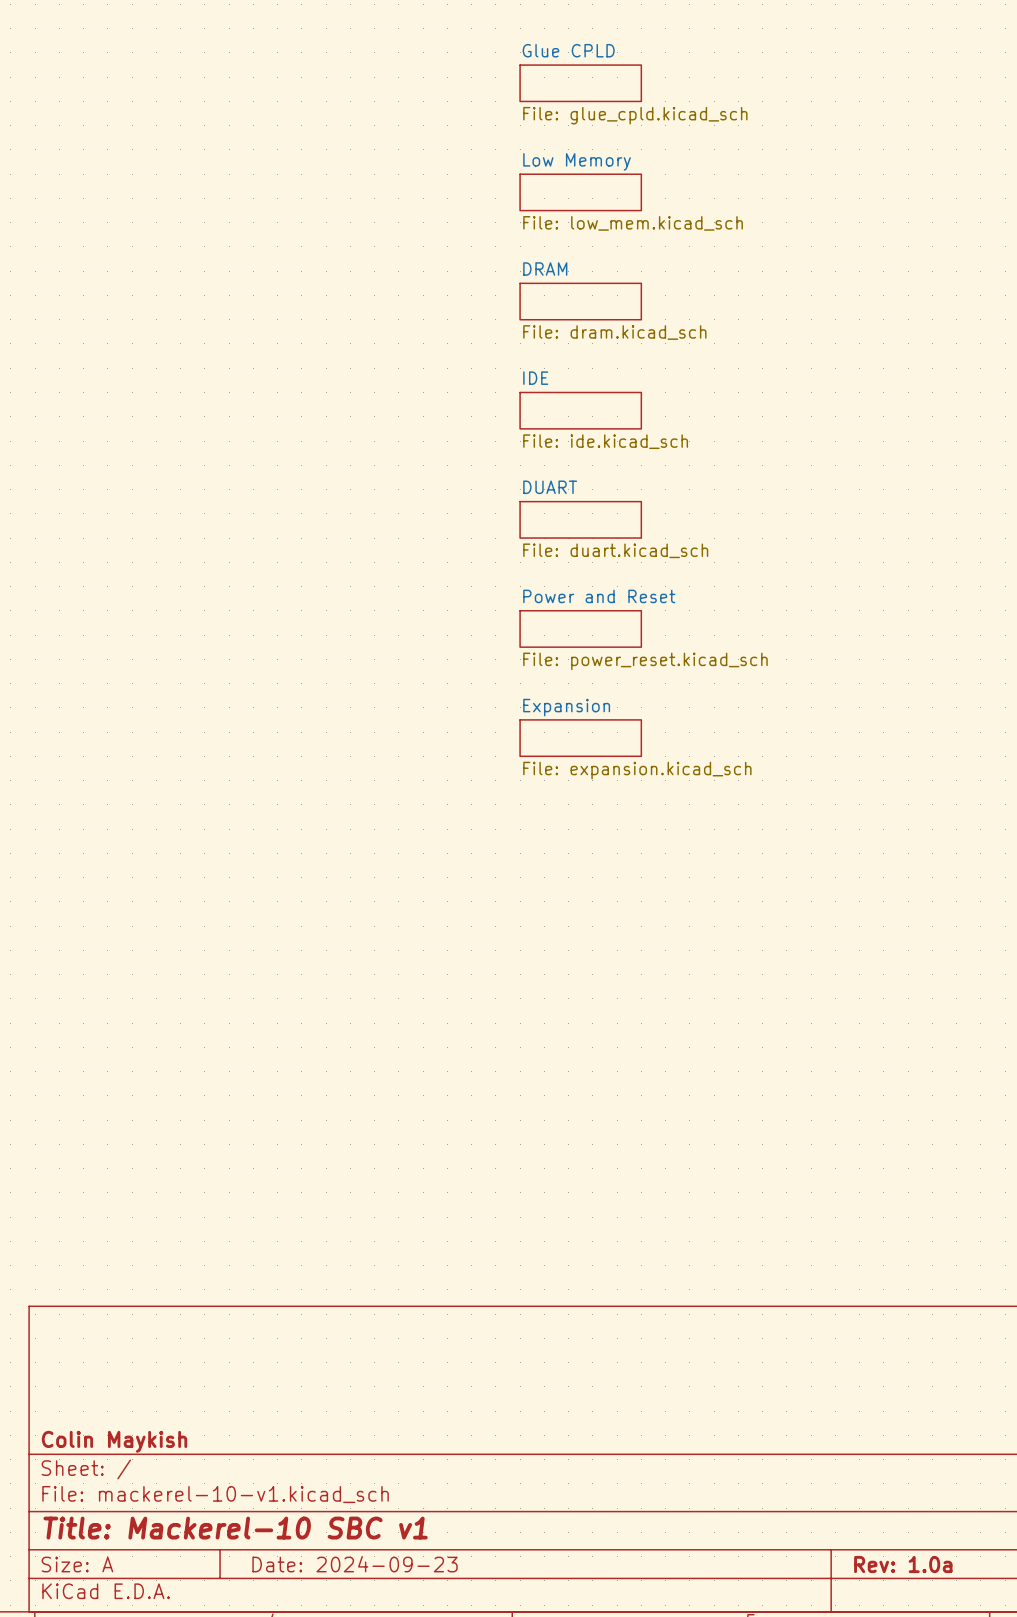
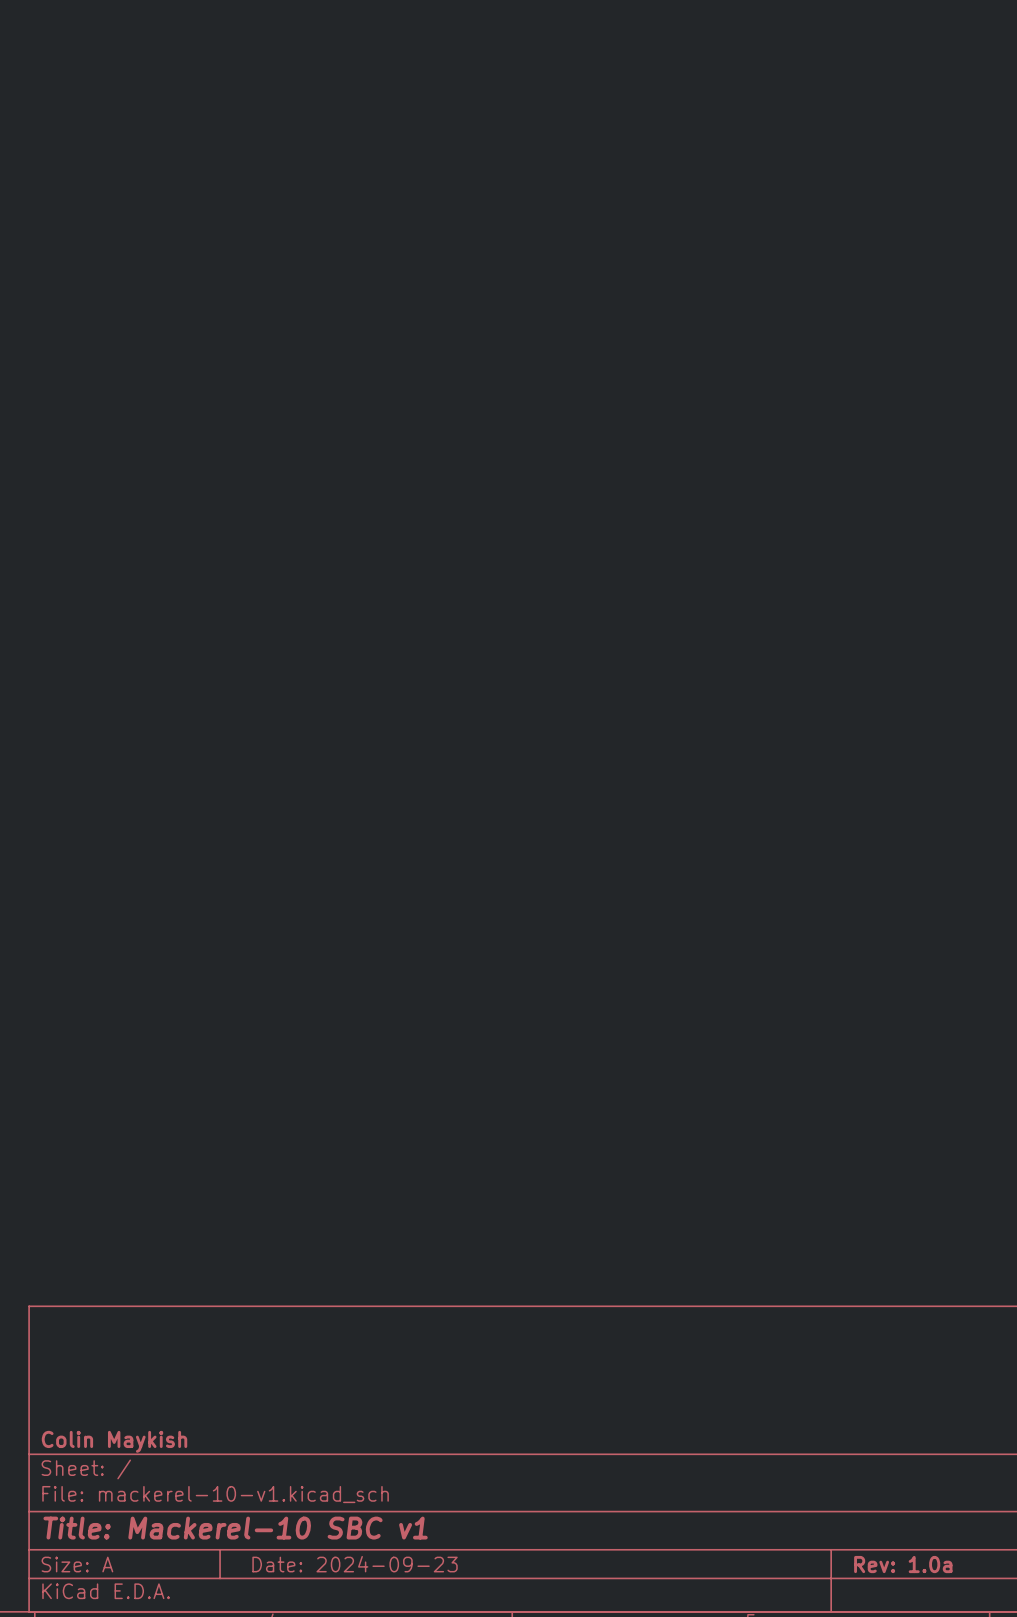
sheet Glue CPLD: File: glue_cpld.kicad_sch (580, 83) -> none
sheet Low Memory: File: low_mem.kicad_sch (580, 192) -> none
sheet DRAM: File: dram.kicad_sch (580, 301) -> none
sheet IDE: File: ide.kicad_sch (580, 410) -> none
sheet DUART: File: duart.kicad_sch (580, 519) -> none
sheet Power and Reset: File: power_reset.kicad_sch (580, 628) -> none
sheet Expansion: File: expansion.kicad_sch (580, 738) -> none

